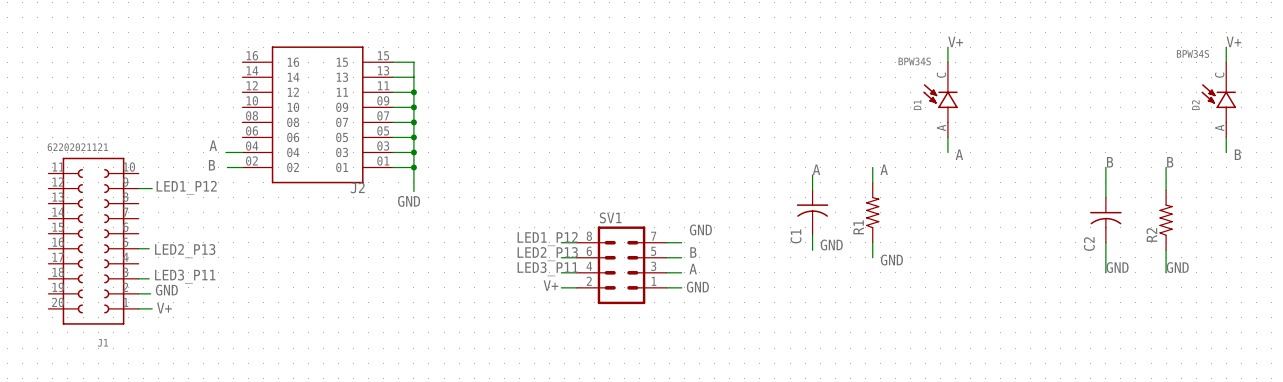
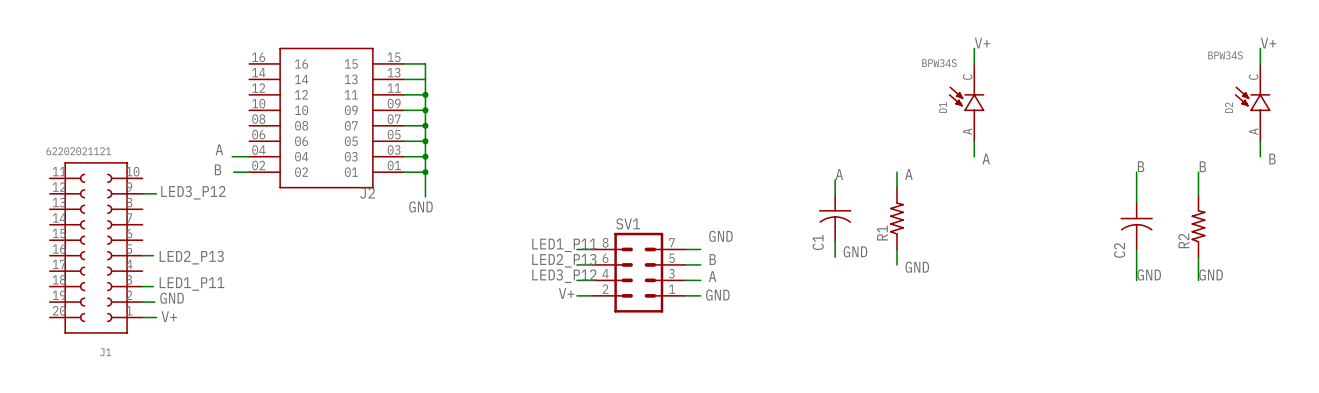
label: LED1_P12 (186, 187) -> LED3_P12 (193, 192)
label: LED1_P12 (547, 239) -> LED1_P11 (564, 245)
label: LED3_P11 (547, 269) -> LED3_P12 (564, 276)
label: LED3_P11 (185, 276) -> LED1_P11 (191, 284)

